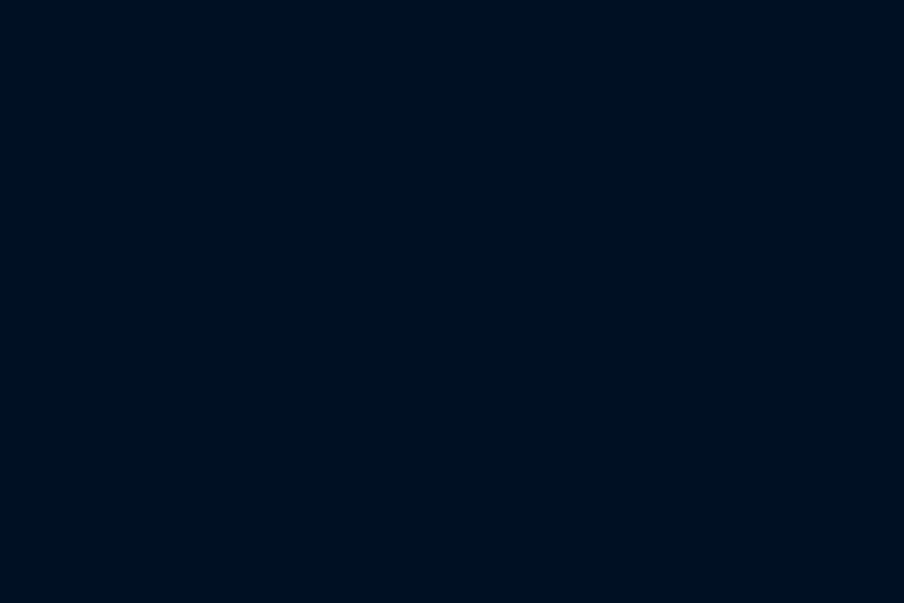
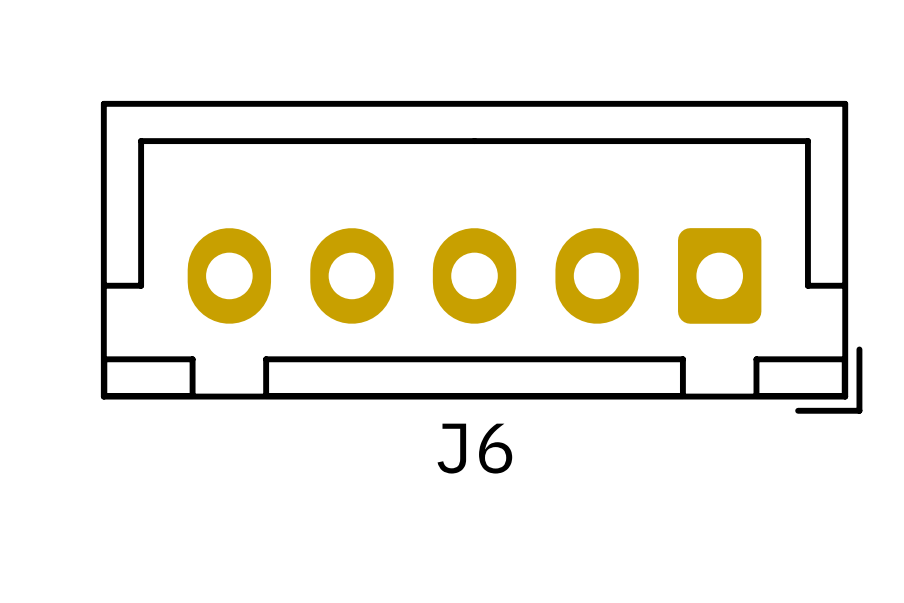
J6: none -> (481, 257)

